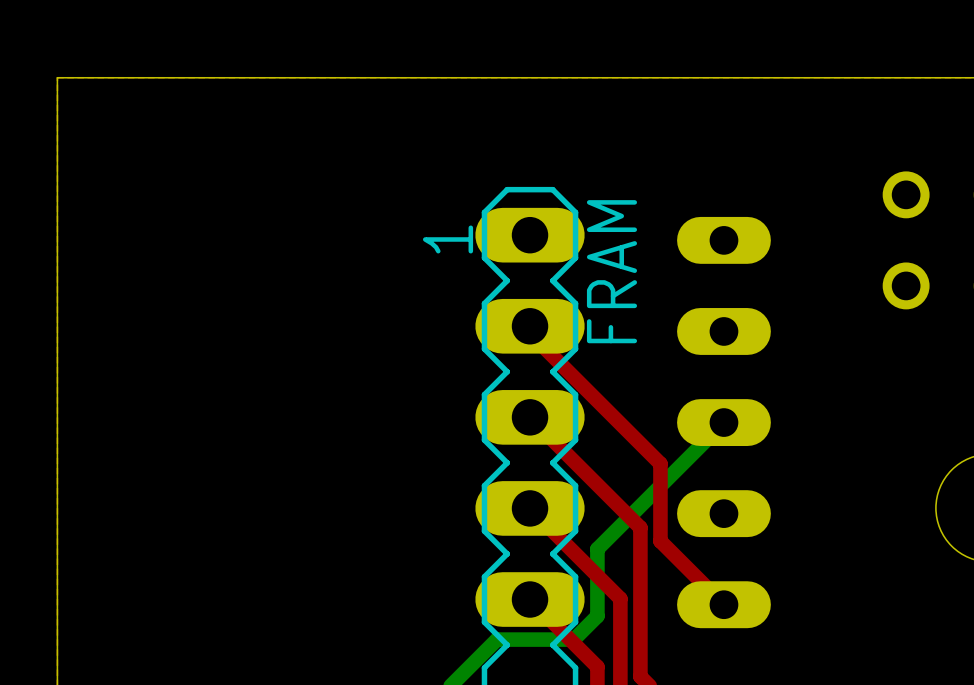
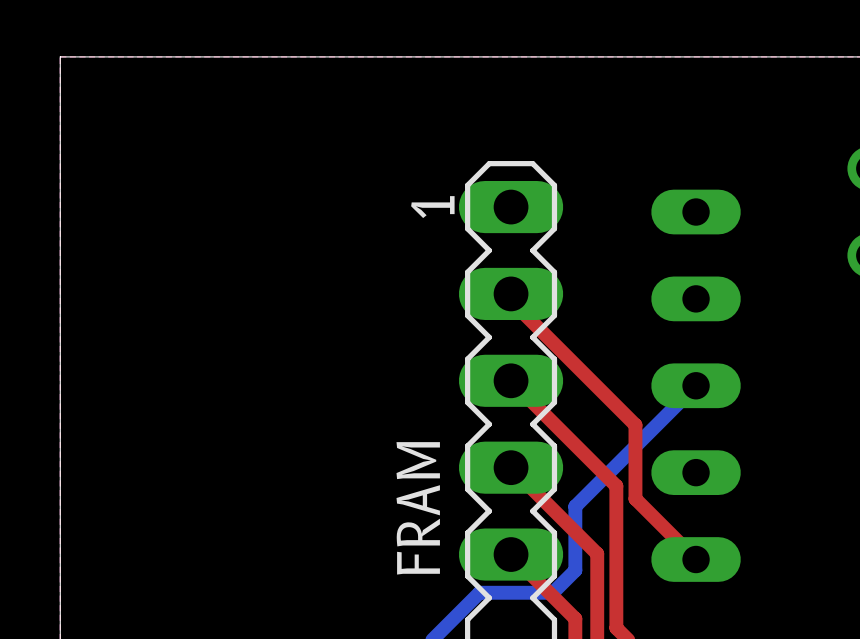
FRAM name position: FRAM (611, 271) -> FRAM (418, 508)

